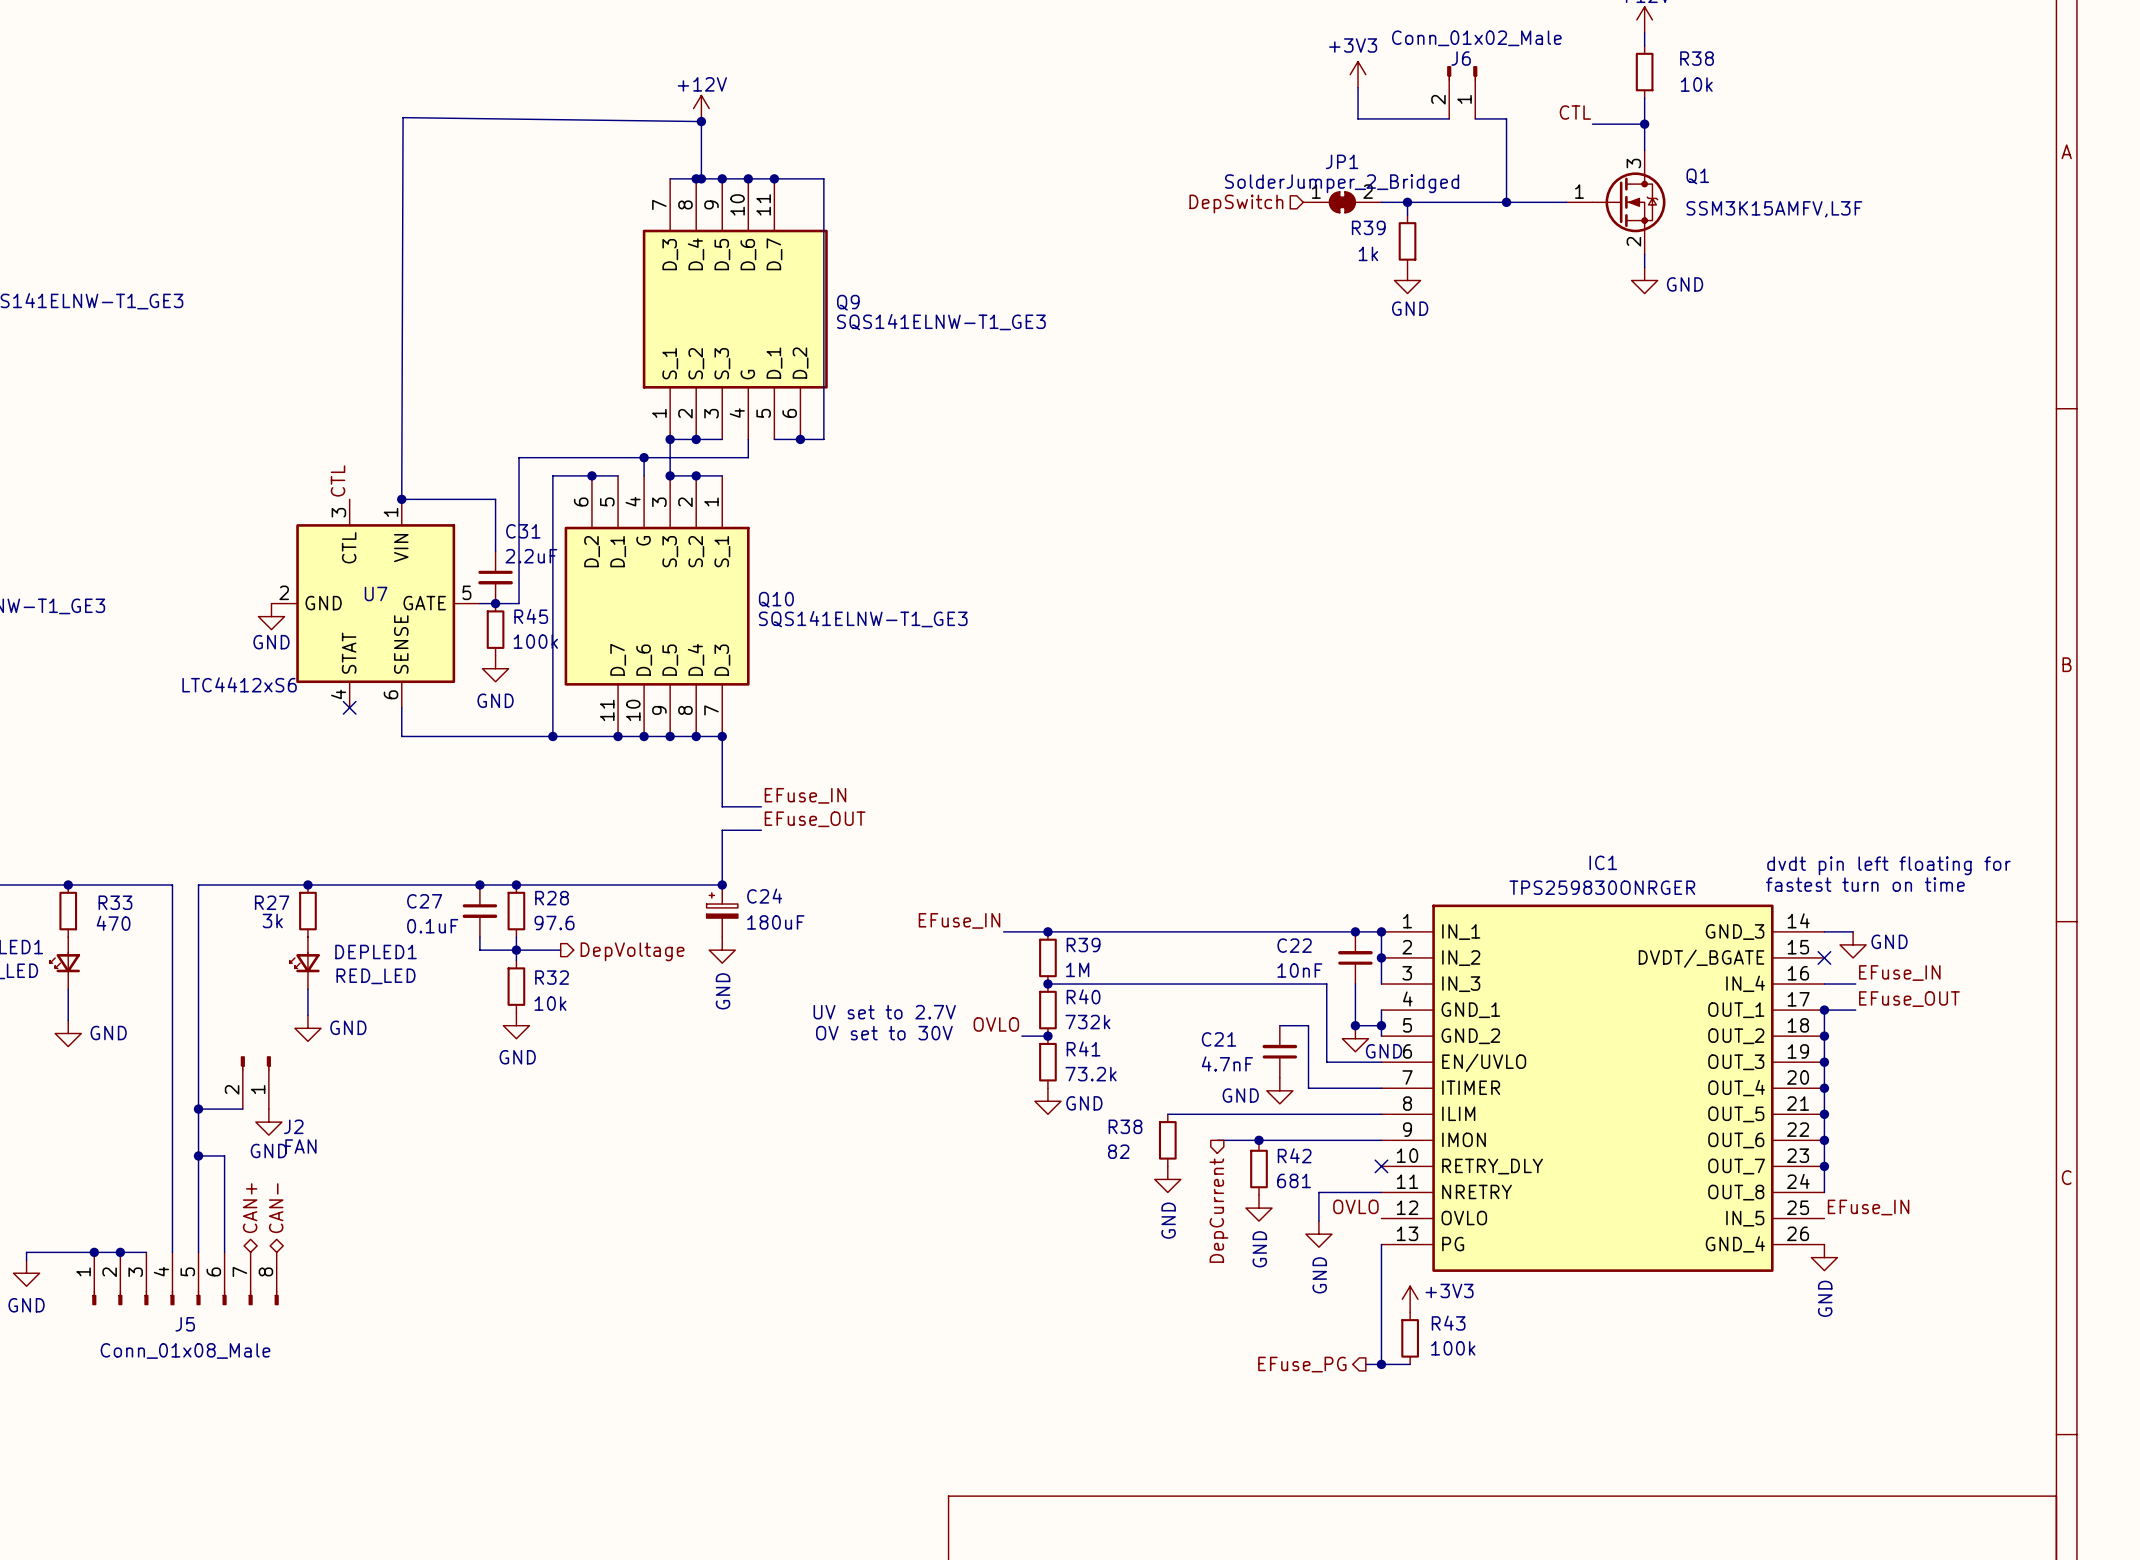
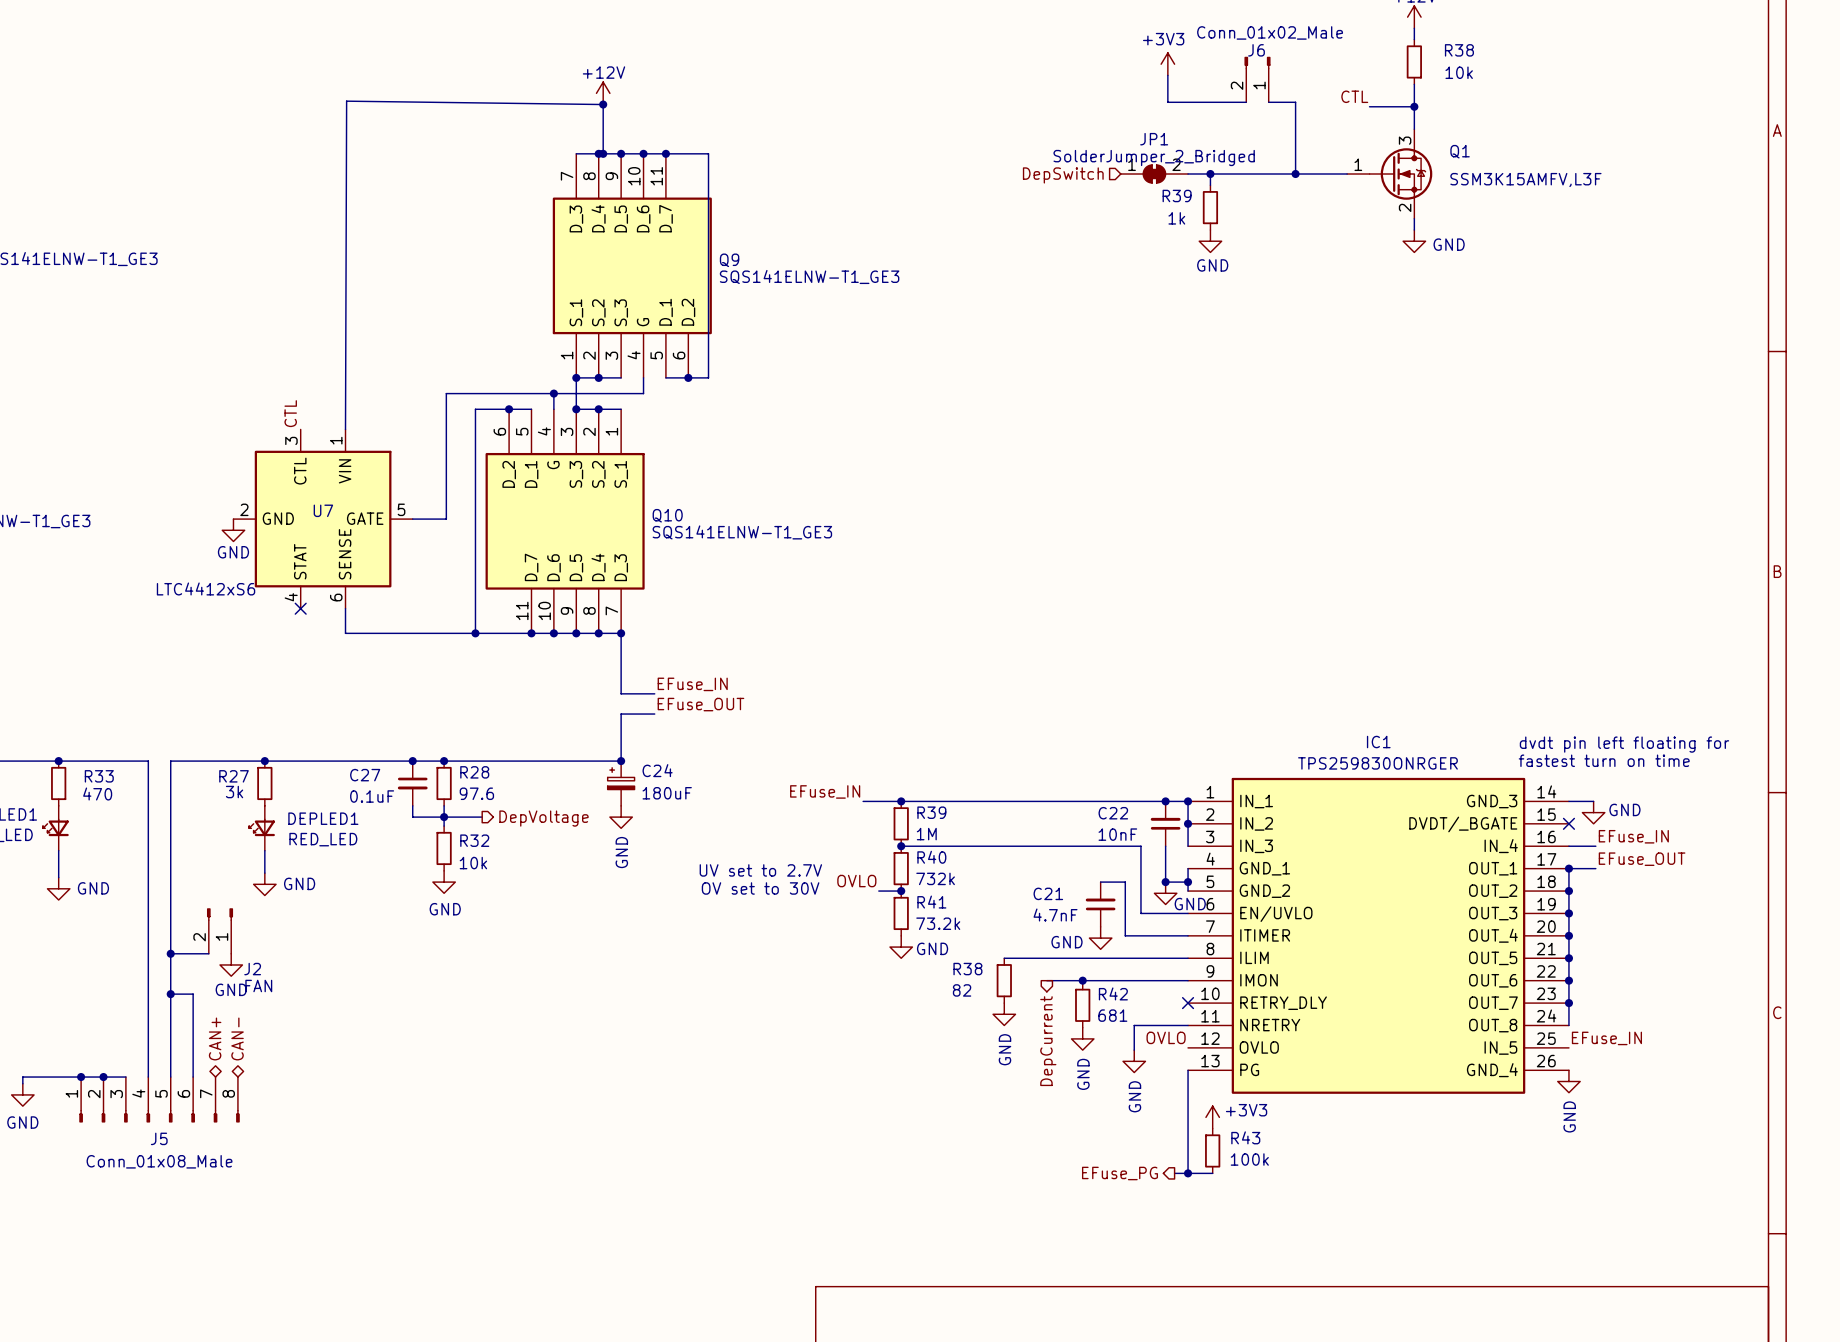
wire: (401, 499) (495, 499) (495, 551) -> none
junction: (401, 499) -> none
C31: 2.2uF (495, 577) -> none
junction: (495, 603) -> none
R45: 100k (495, 629) -> none
power symbol: GND (495, 668) -> none

